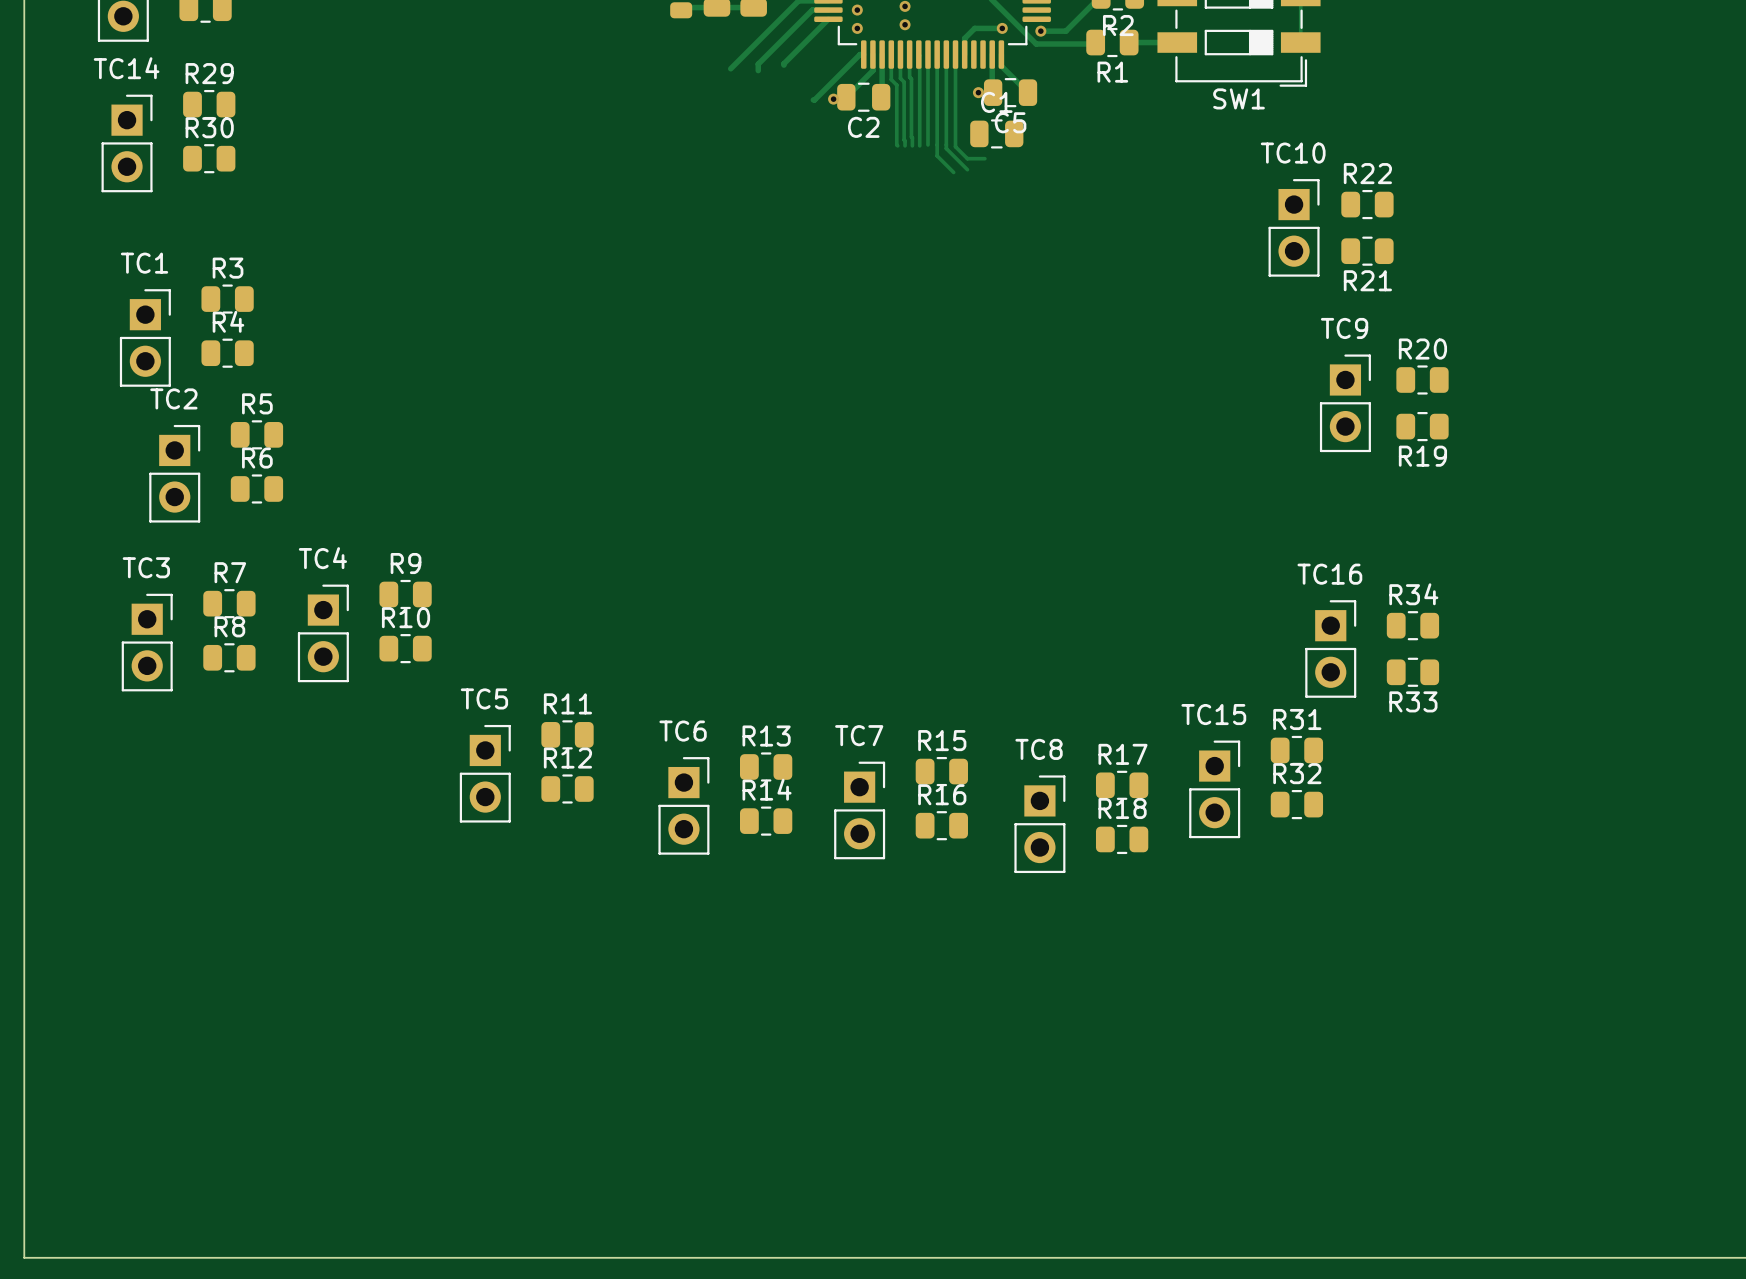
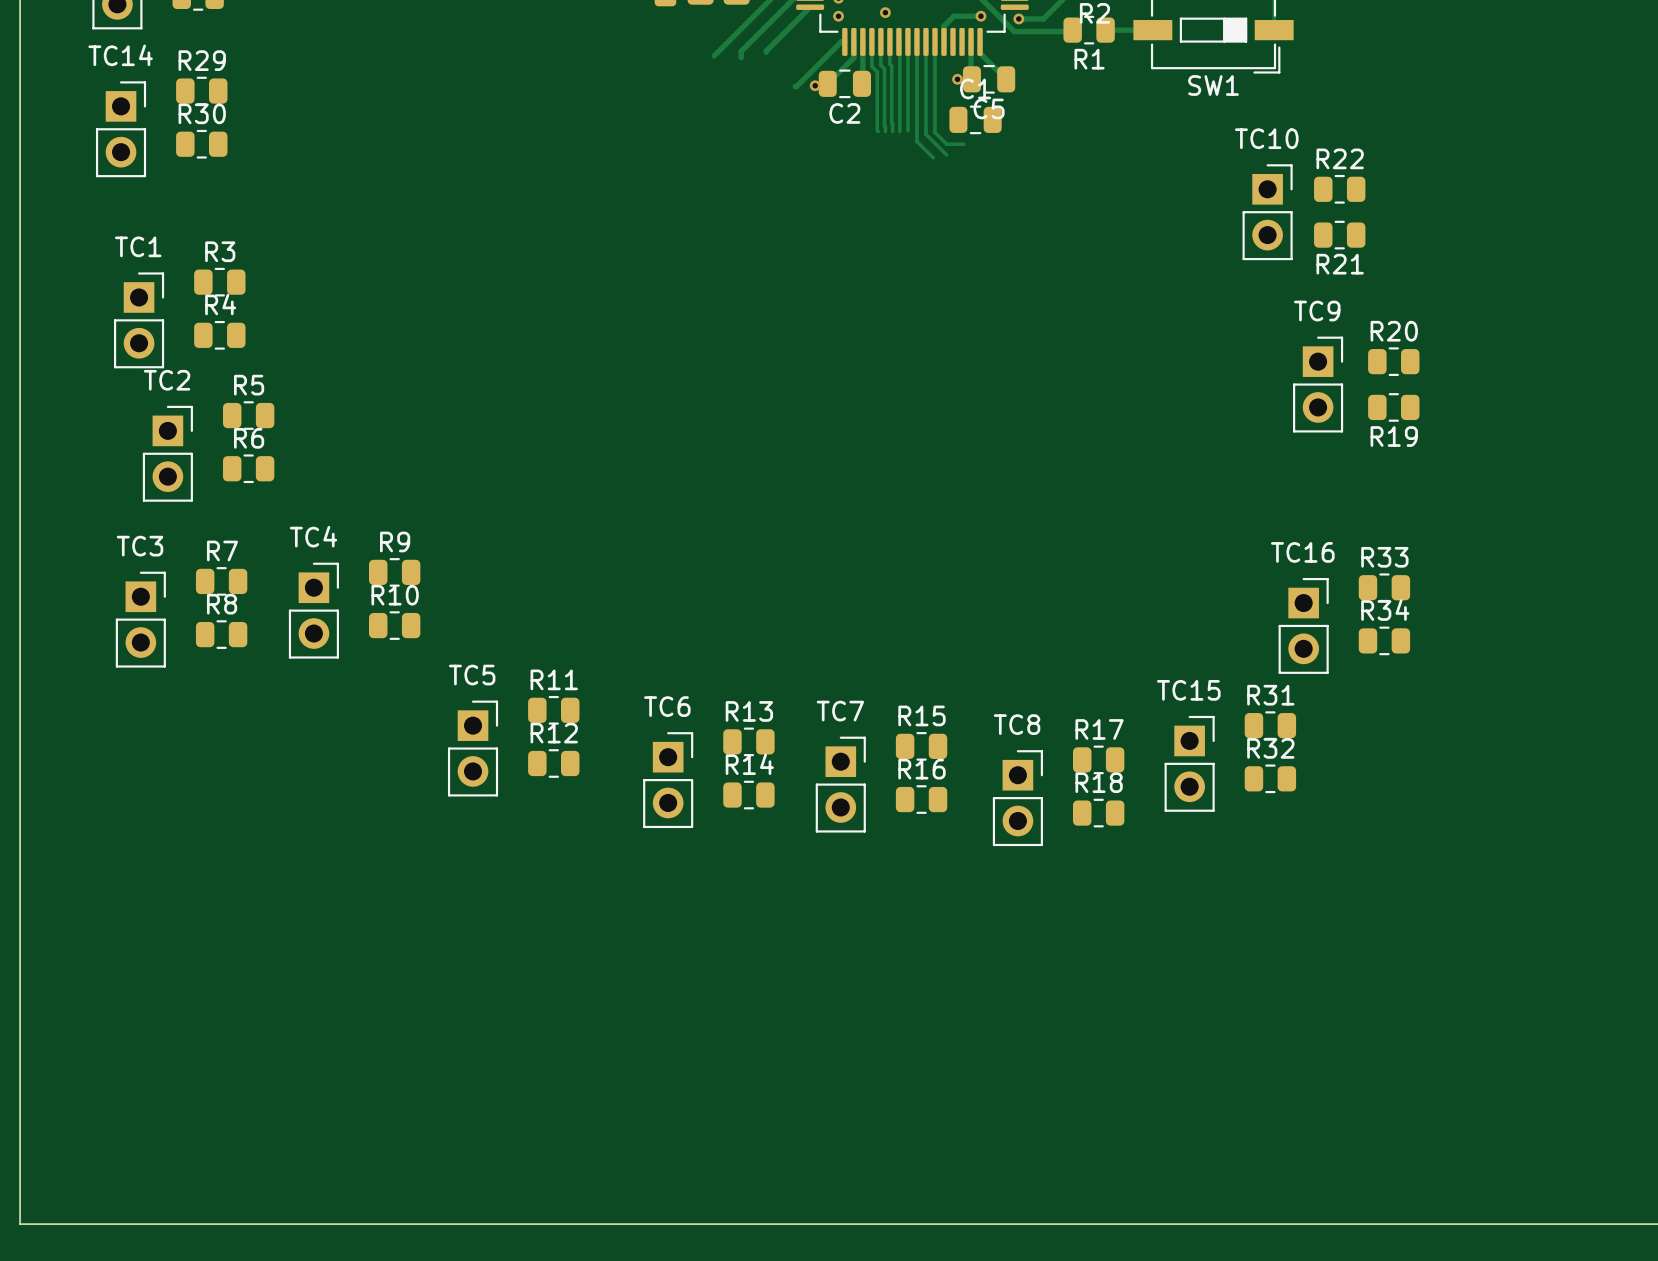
R34 position: (1412, 625) -> (1384, 640)
R33 position: (1412, 672) -> (1384, 587)
R33 name position: R33 (1413, 701) -> R33 (1384, 557)

